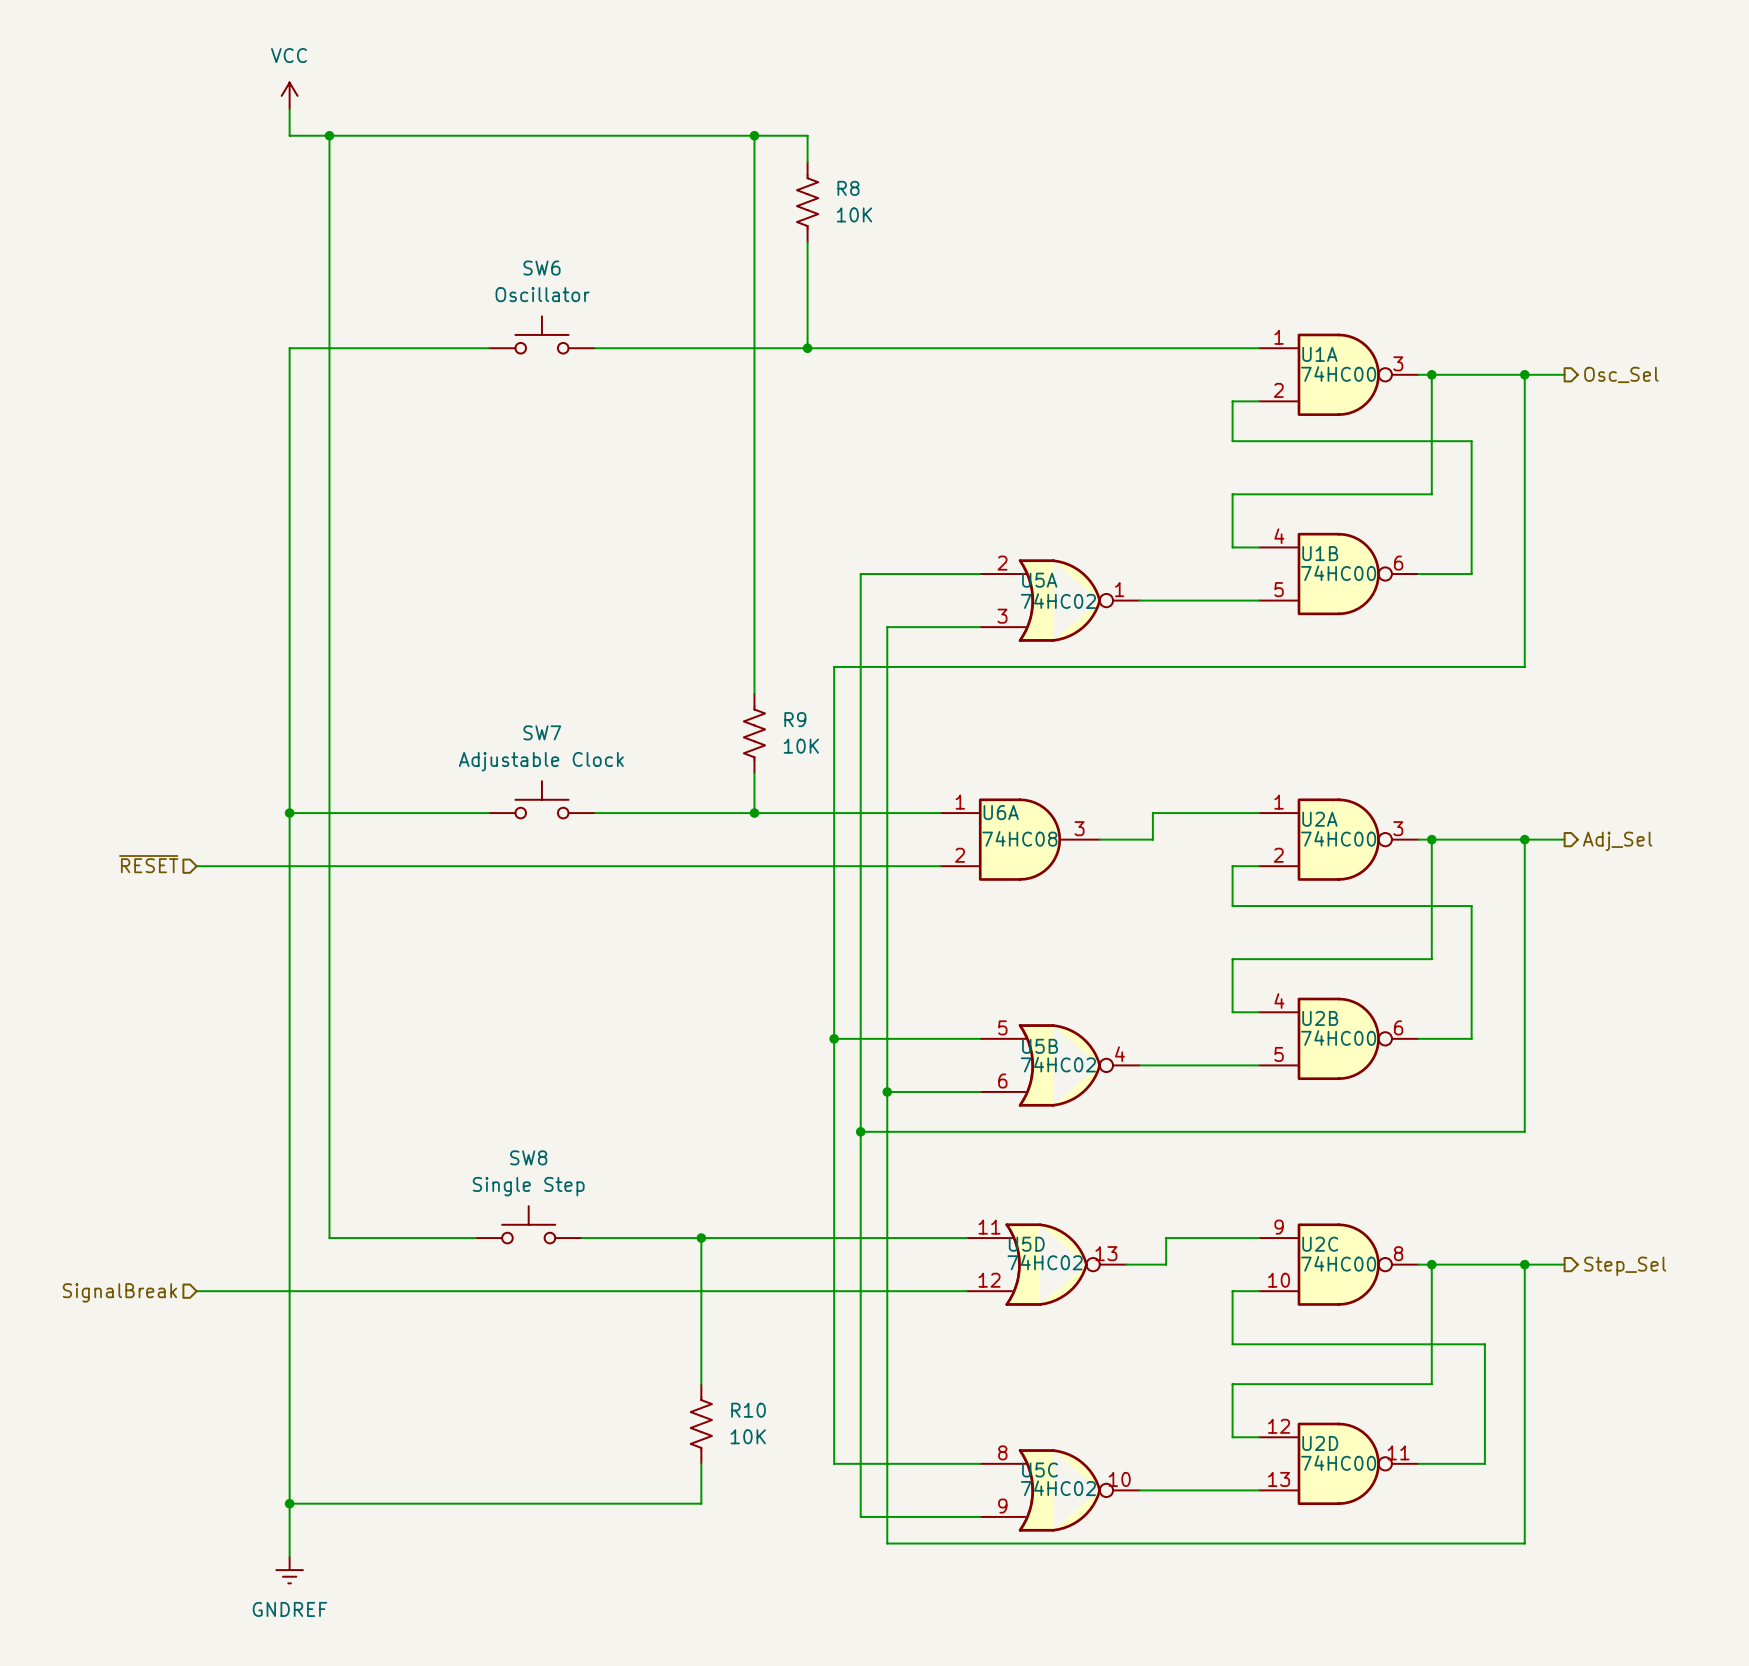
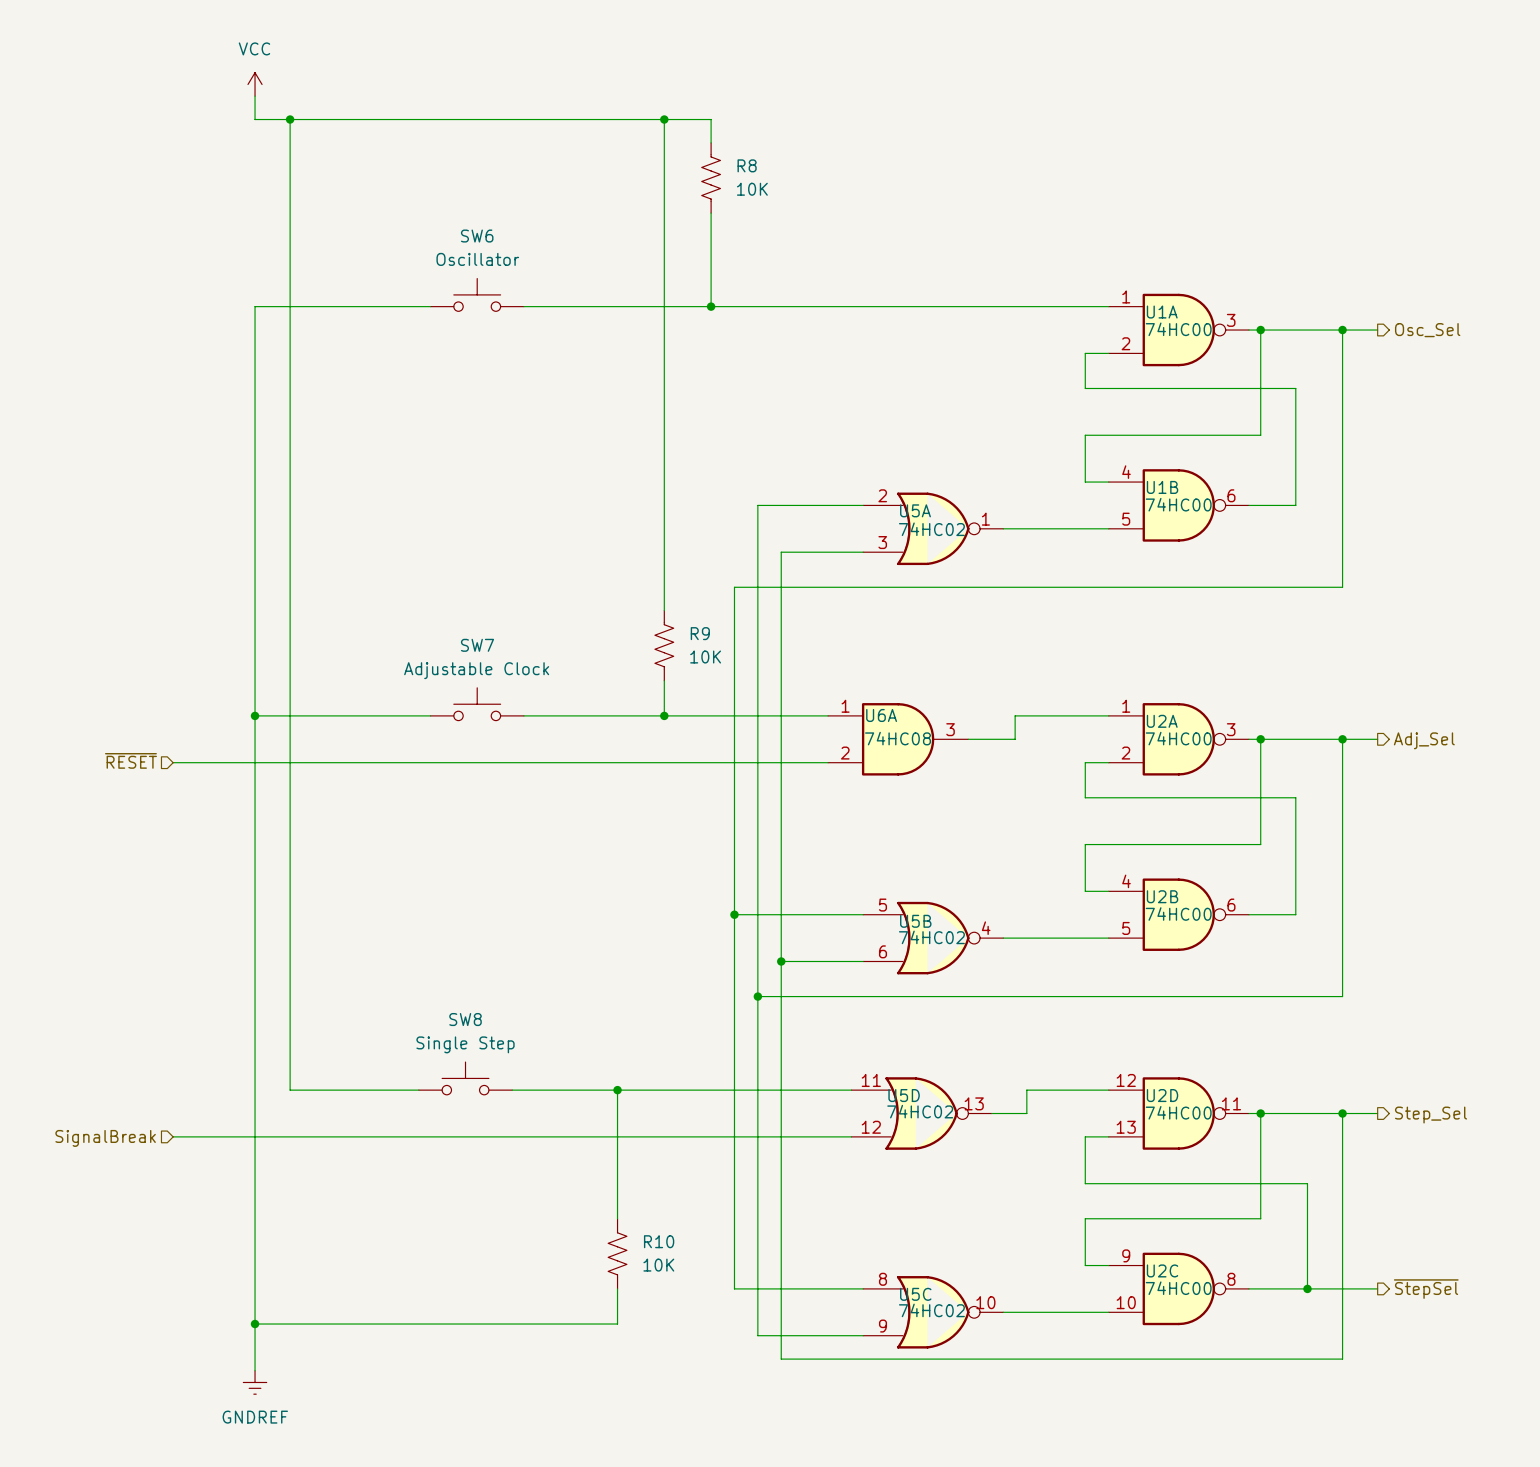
U2C position: (1338, 1264) -> (1178, 1288)
U2D position: (1338, 1463) -> (1178, 1113)
wire: none -> (1307, 1288) (1377, 1288)
junction: none -> (1307, 1288)
hierarchical label: none -> ~{StepSel} (1426, 1289)

